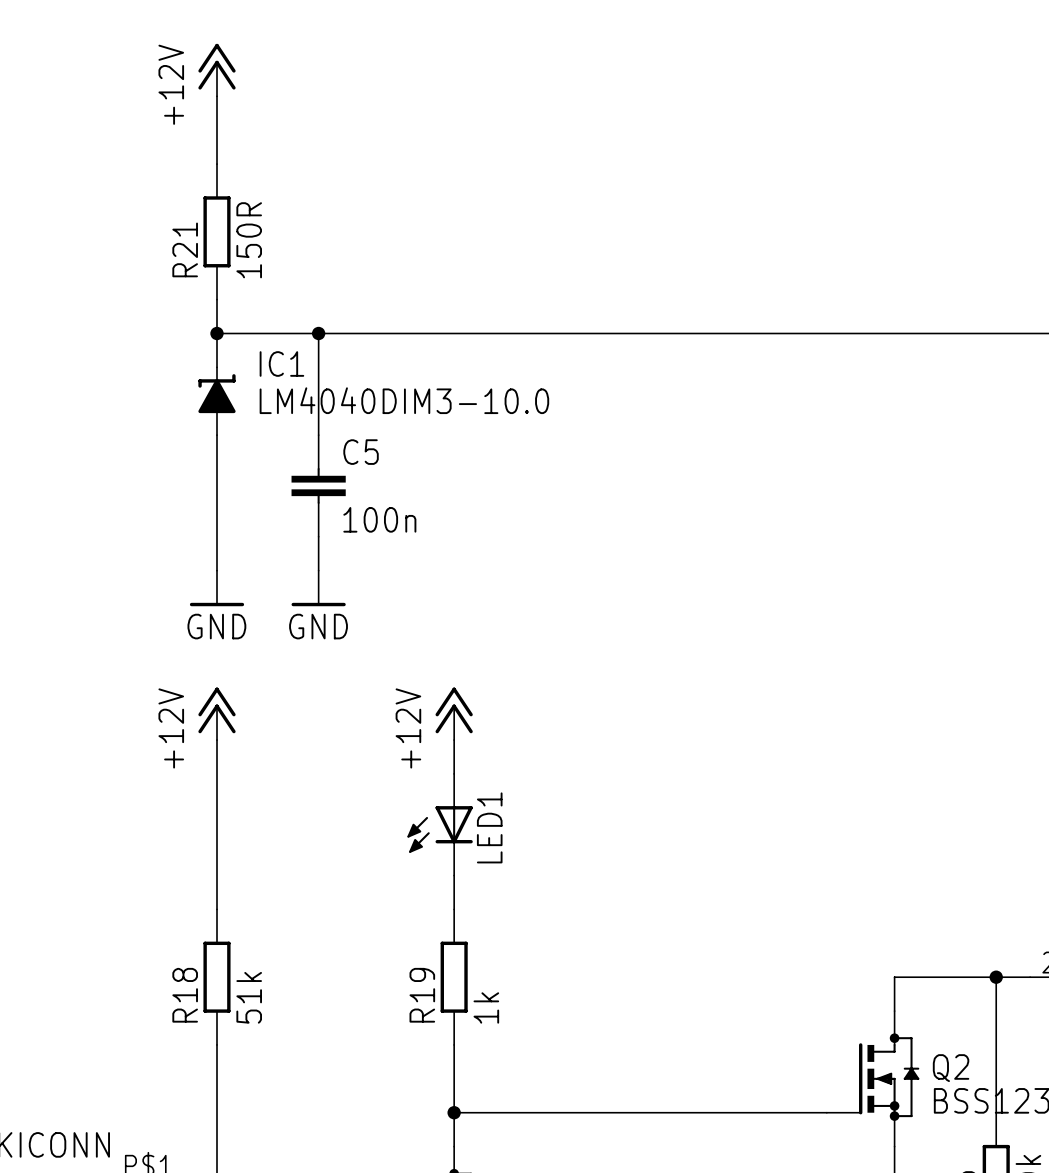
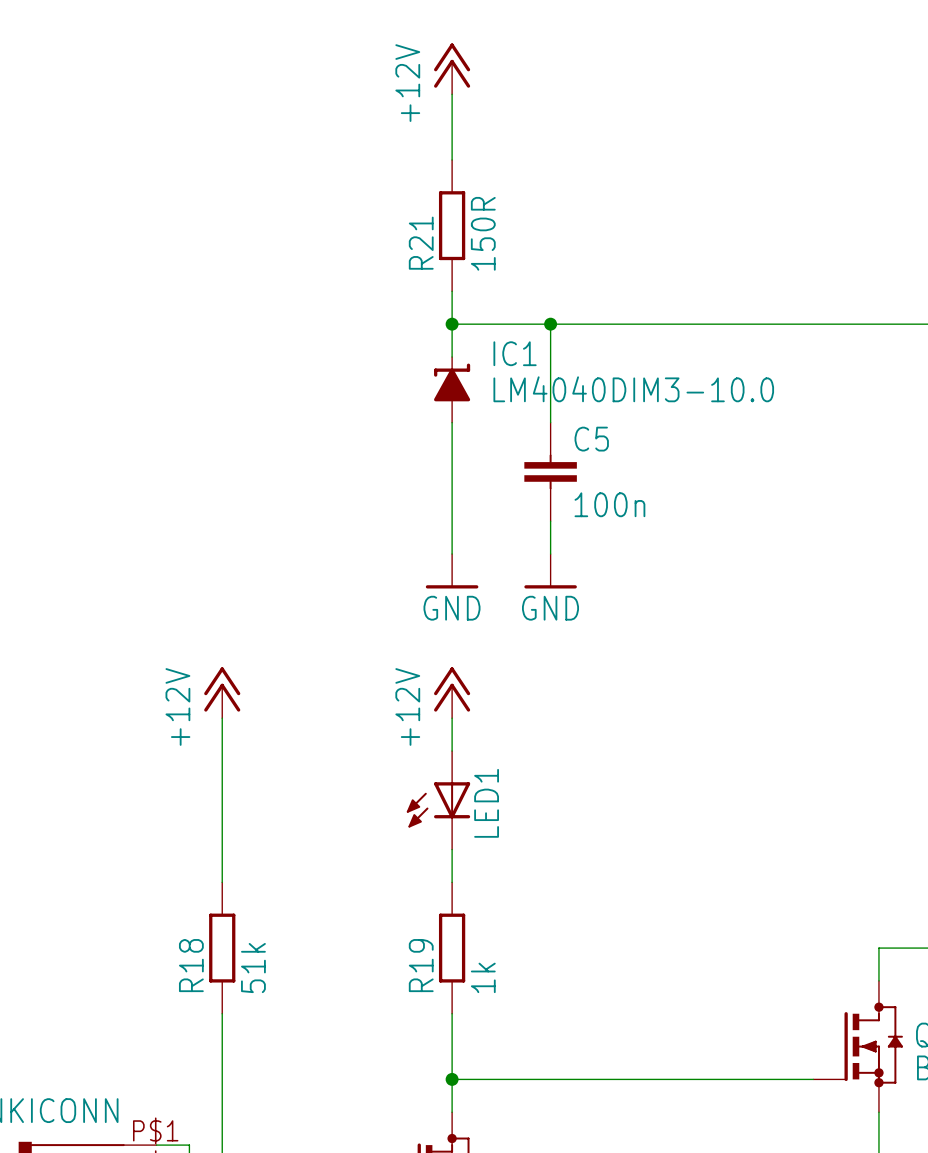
power symbol position: +12V (217, 70) -> +12V (452, 68)
wire: (217, 96) (217, 164) -> (452, 94) (452, 159)
R21 position: (217, 231) -> (452, 225)
wire: (217, 299) (217, 367) -> (452, 291) (452, 357)
wire: (217, 333) (454, 333) -> none
junction: (217, 333) -> none
wire: (318, 333) (318, 435) -> (550, 324) (550, 422)
junction: (318, 333) -> none
junction: none -> (452, 324)
junction: none -> (550, 324)
IC1 position: (217, 401) -> (452, 389)
wire: (217, 435) (217, 570) -> (452, 422) (452, 554)
C5 position: (318, 485) -> (550, 471)
wire: (318, 536) (318, 570) -> (550, 521) (550, 554)
power symbol: GND (217, 588) -> none
power symbol: GND (318, 588) -> none
power symbol: none -> GND (452, 571)
power symbol: none -> GND (550, 571)

